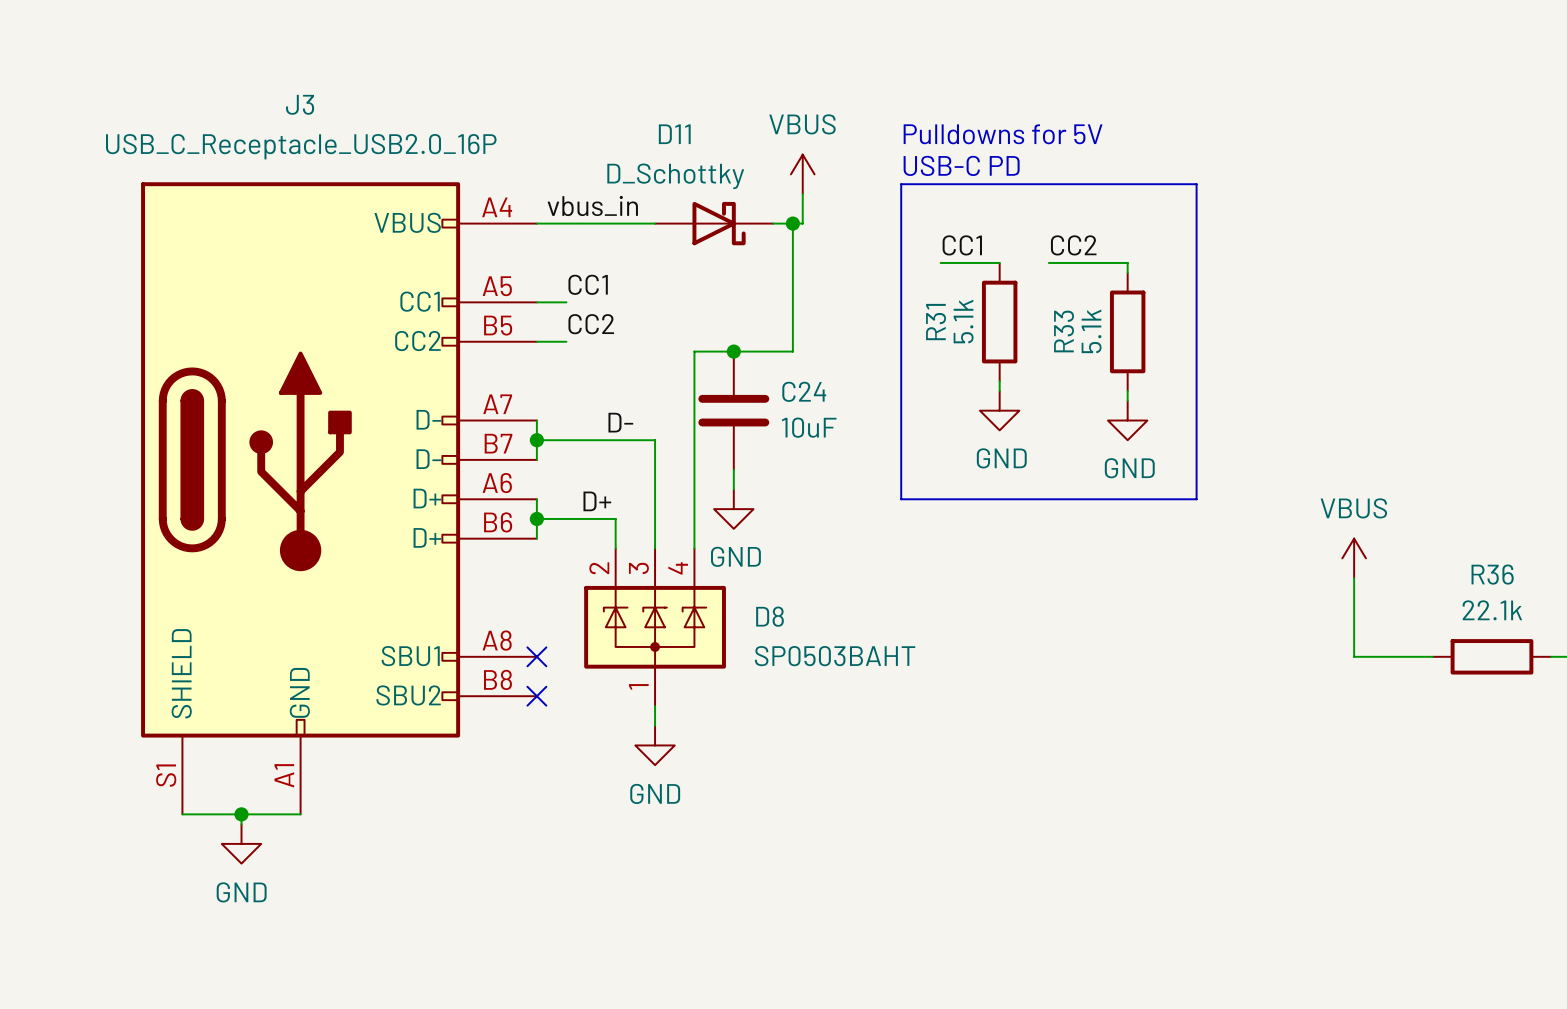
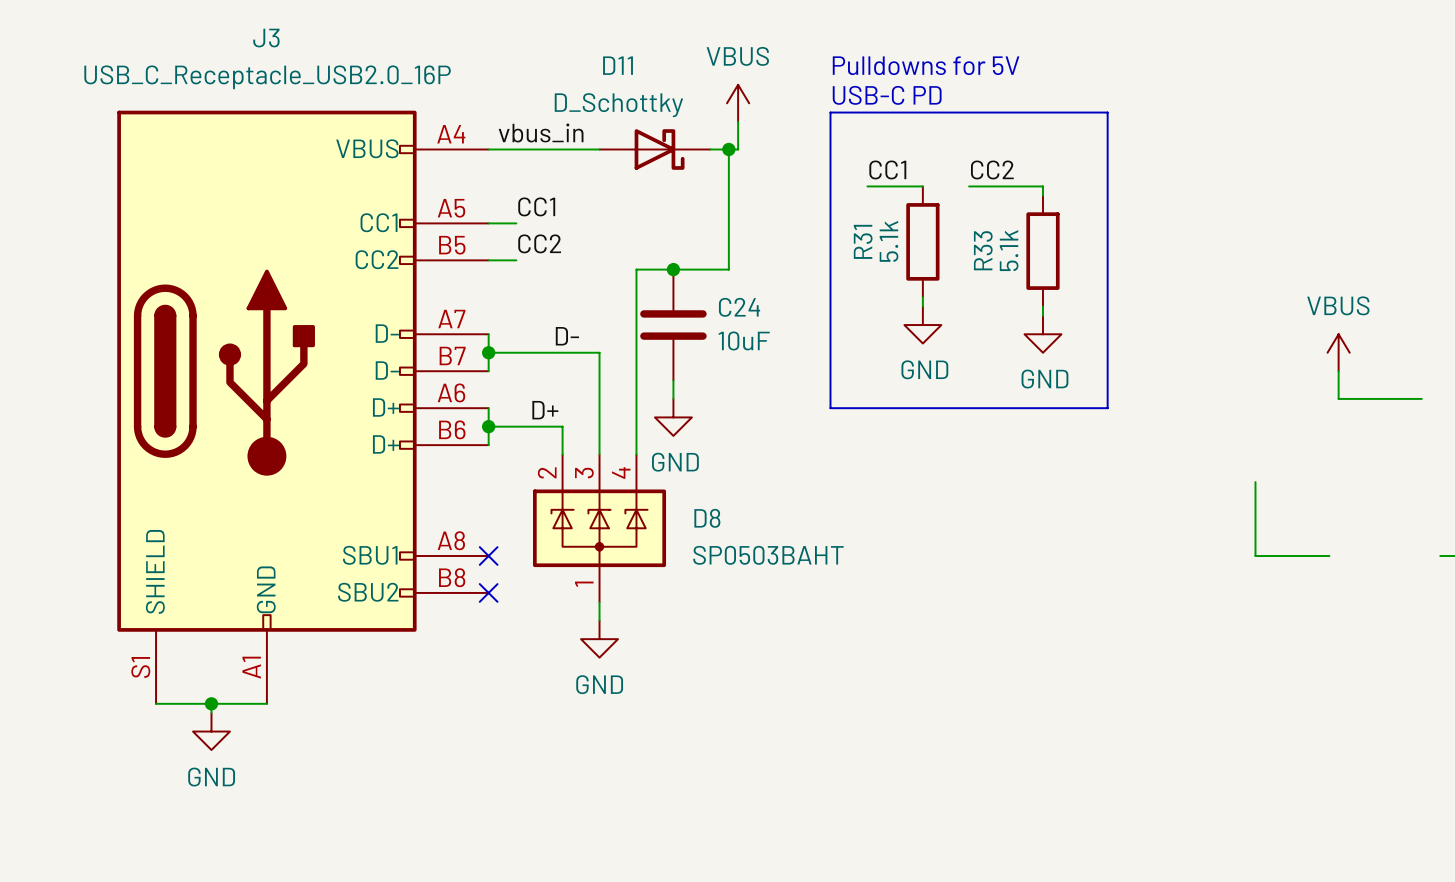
wire: none -> (1338, 371) (1338, 398) (1421, 398)
power symbol position: VBUS (1354, 558) -> VBUS (1338, 352)
R36: 22.1k (1491, 656) -> none

